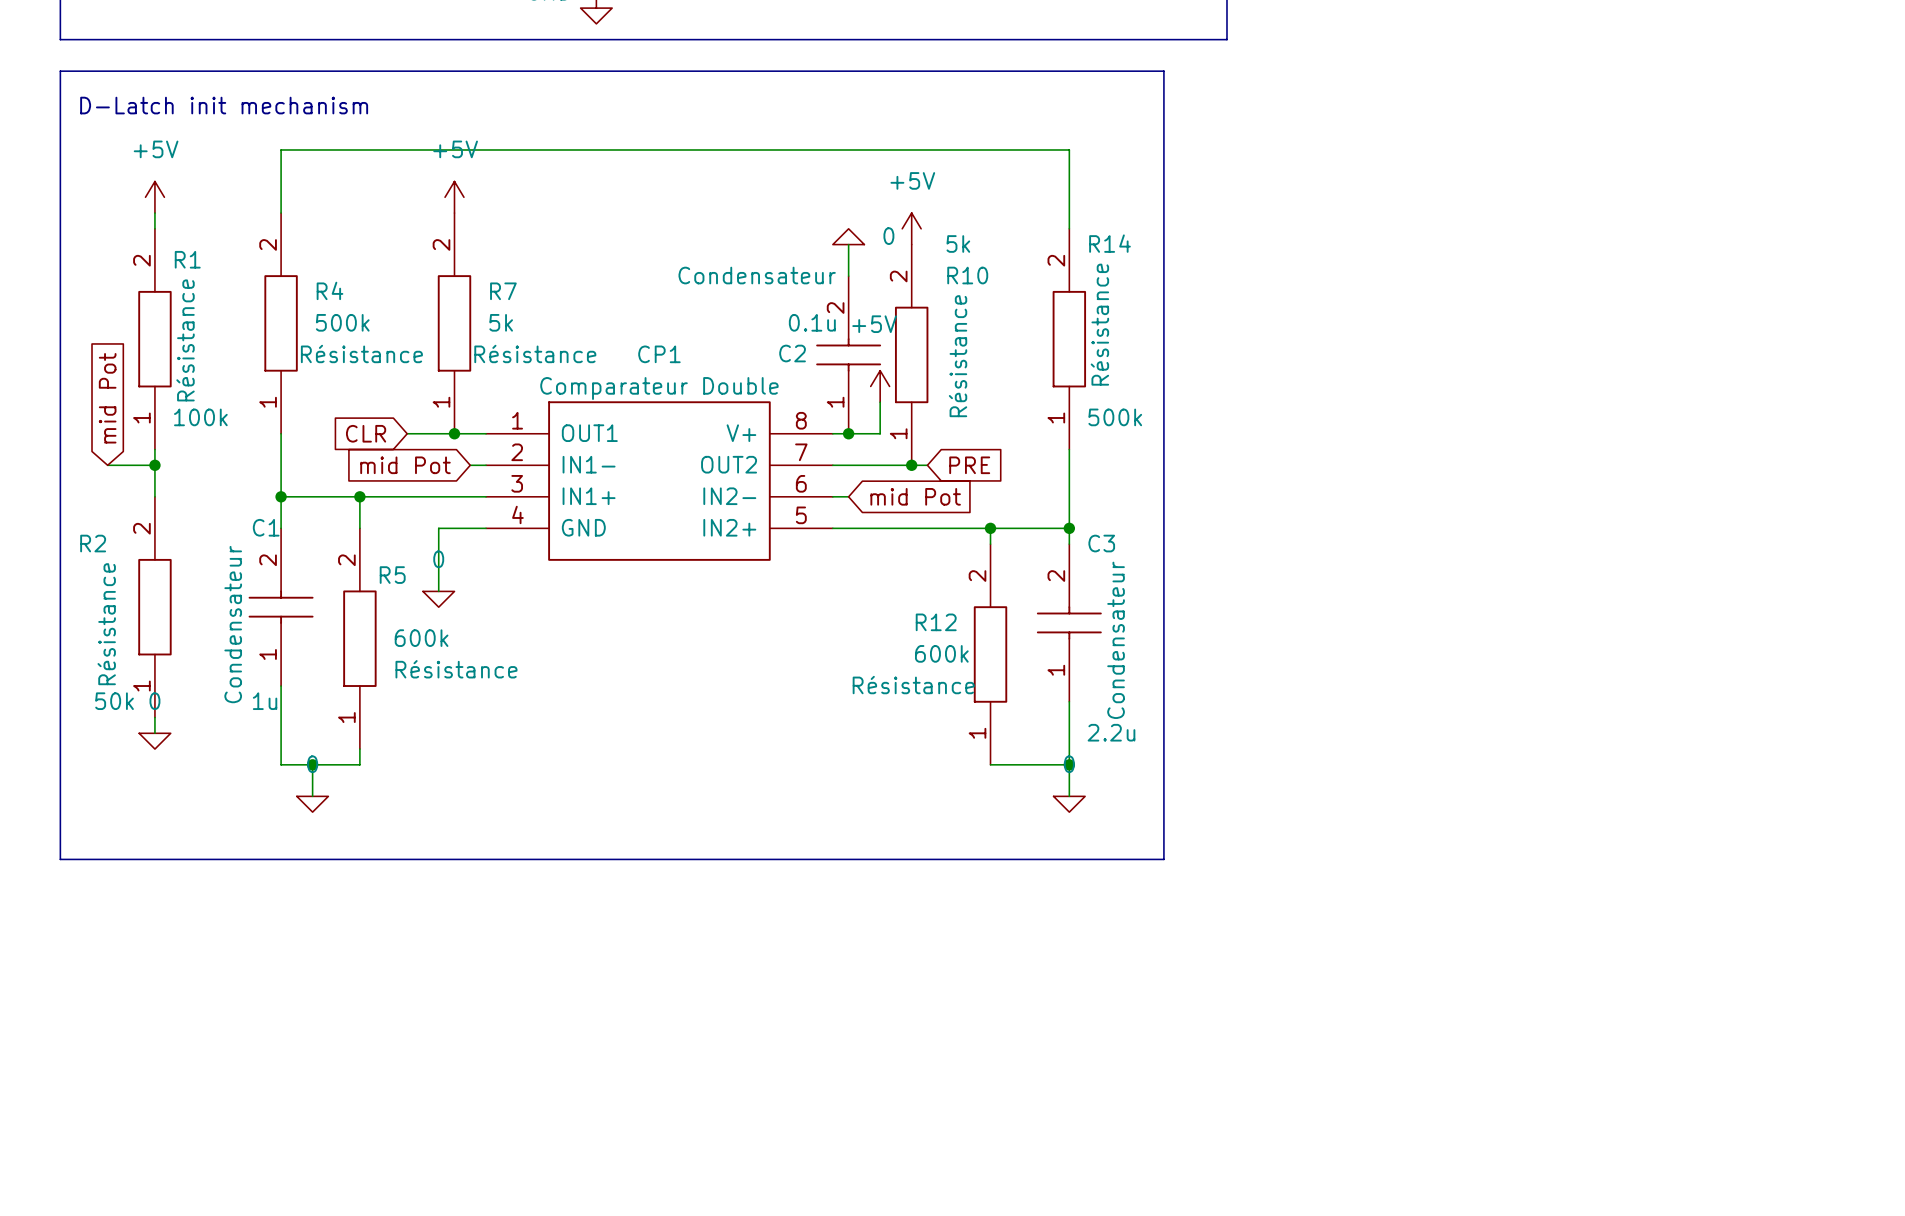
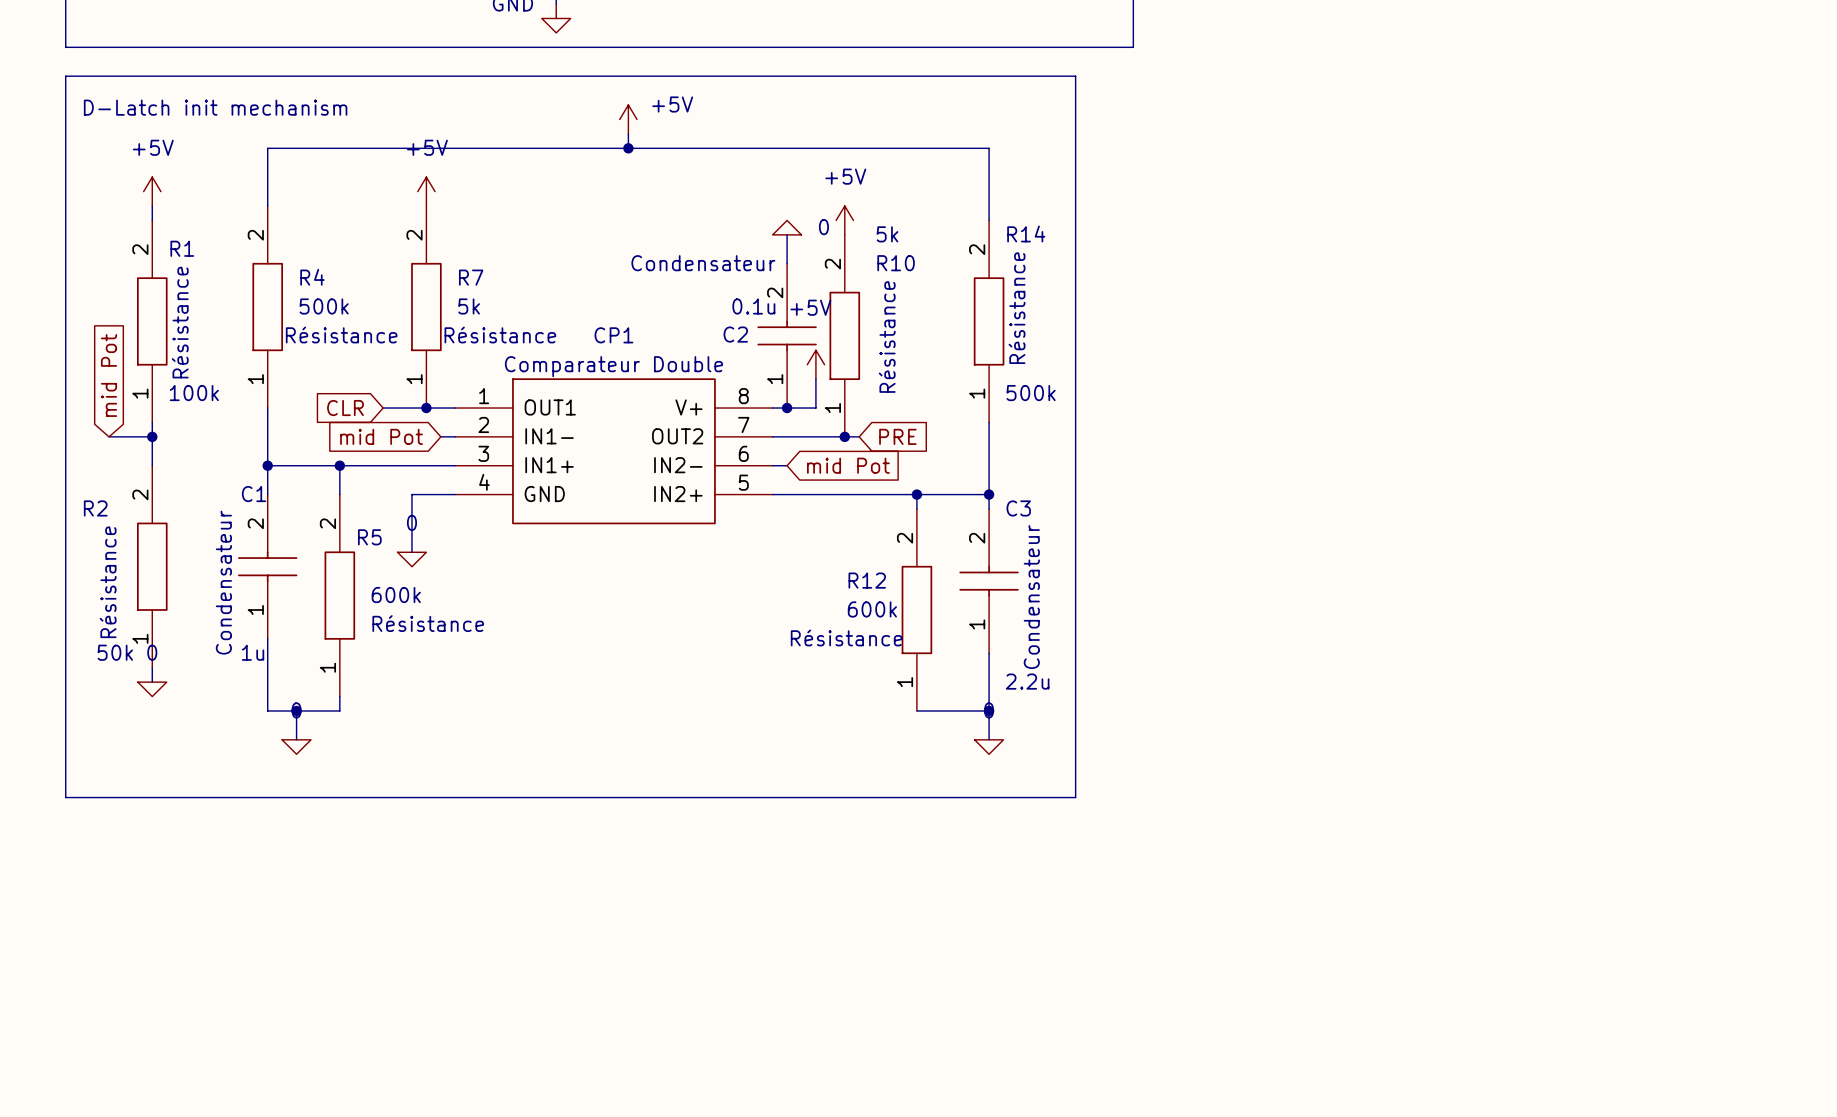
power symbol: none -> +5V (628, 119)
wire: none -> (628, 133) (628, 148)
junction: none -> (628, 148)

